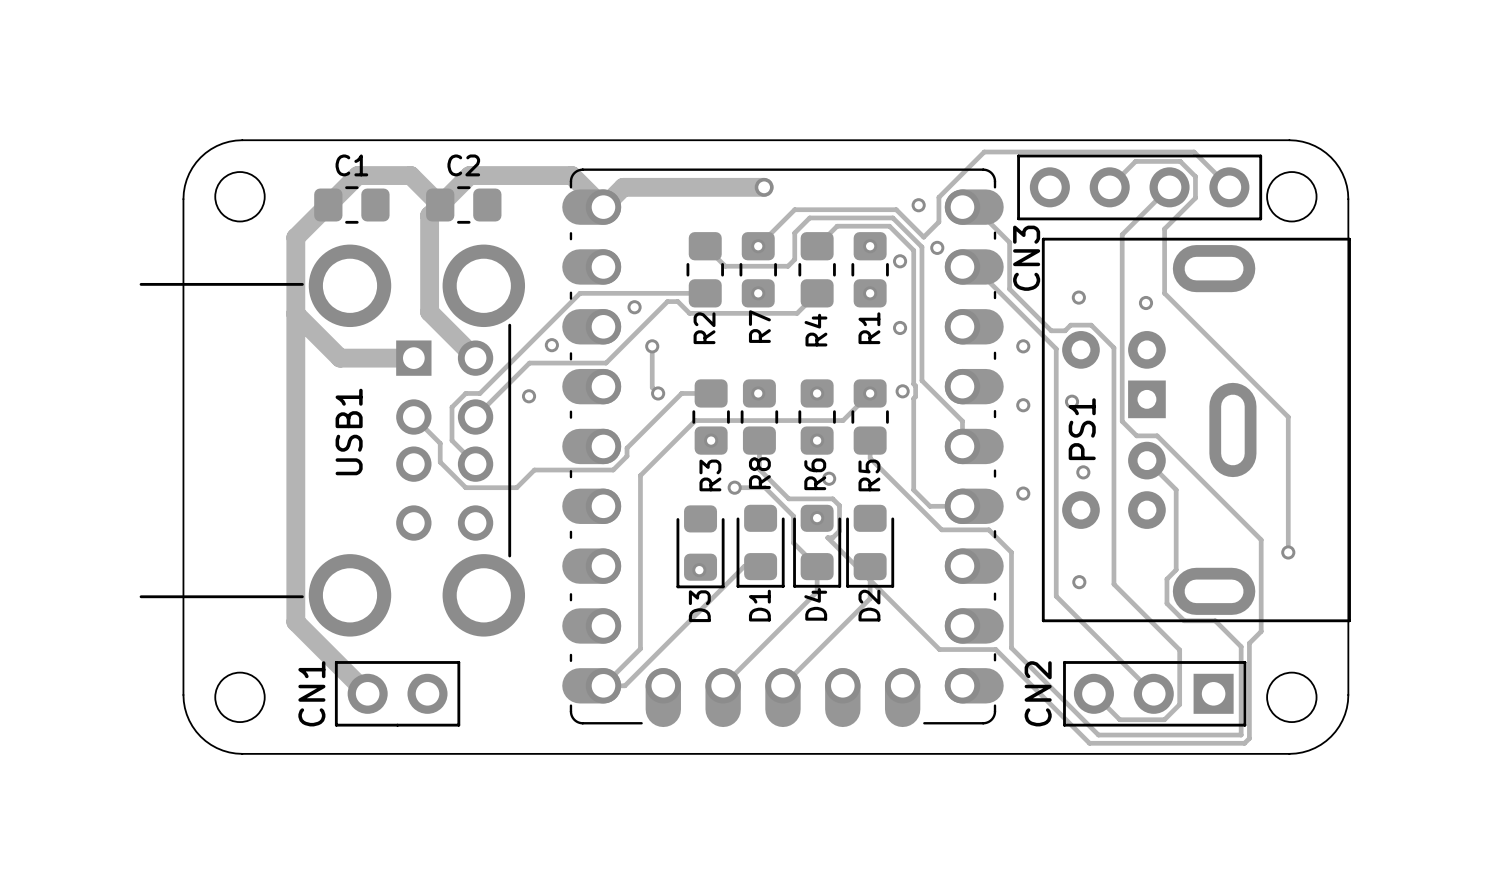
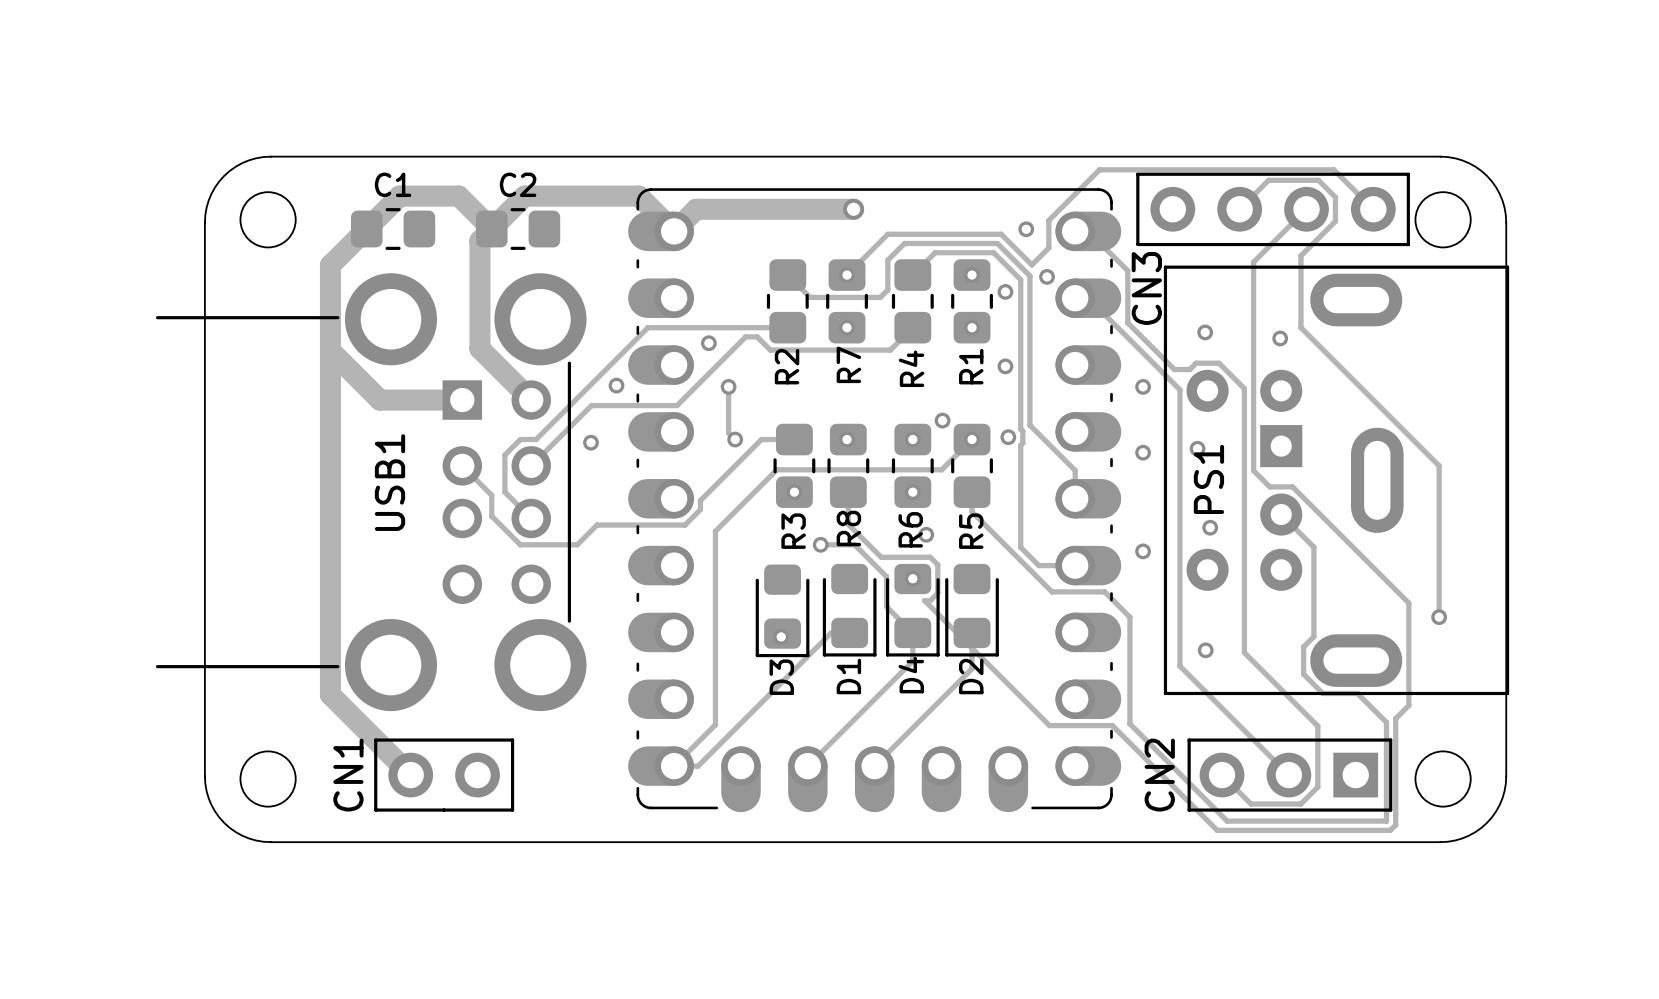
via: none -> (942, 420)

